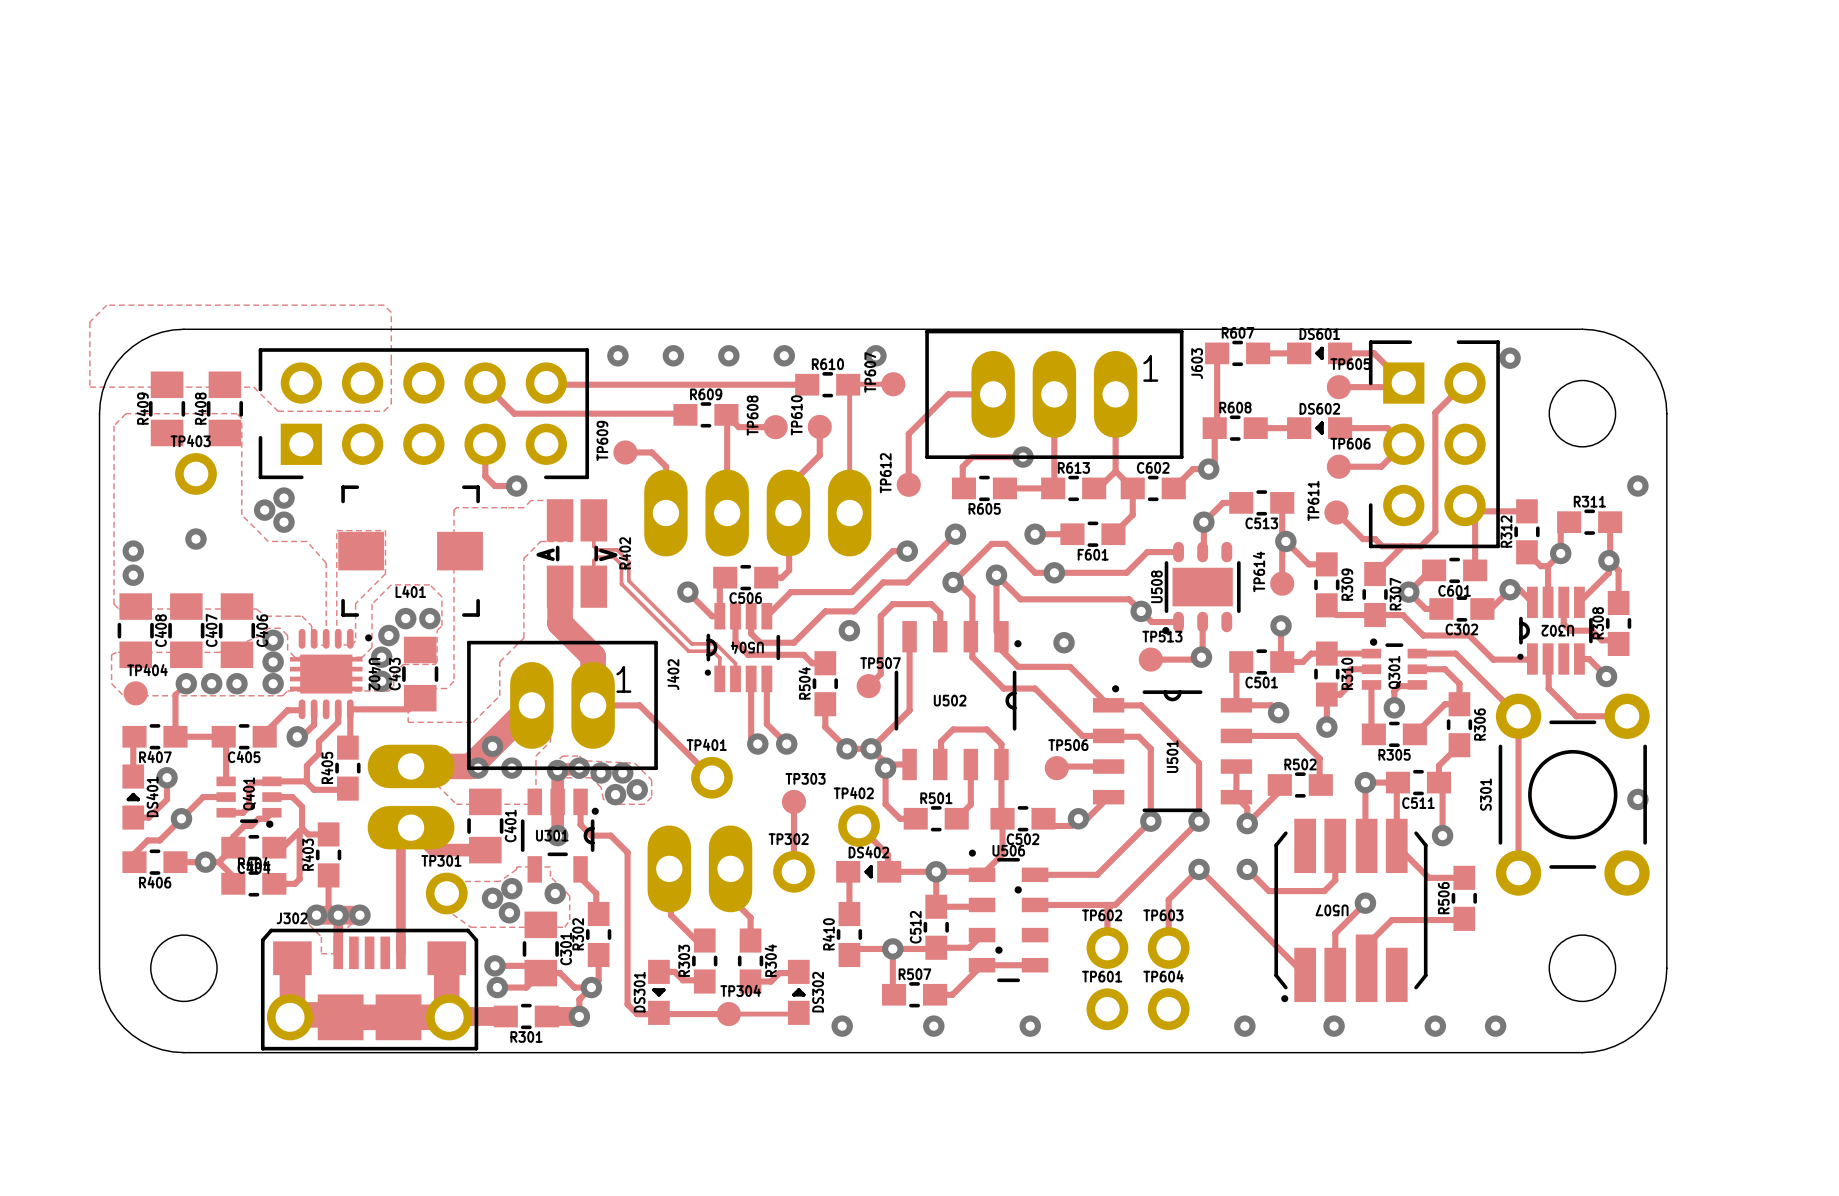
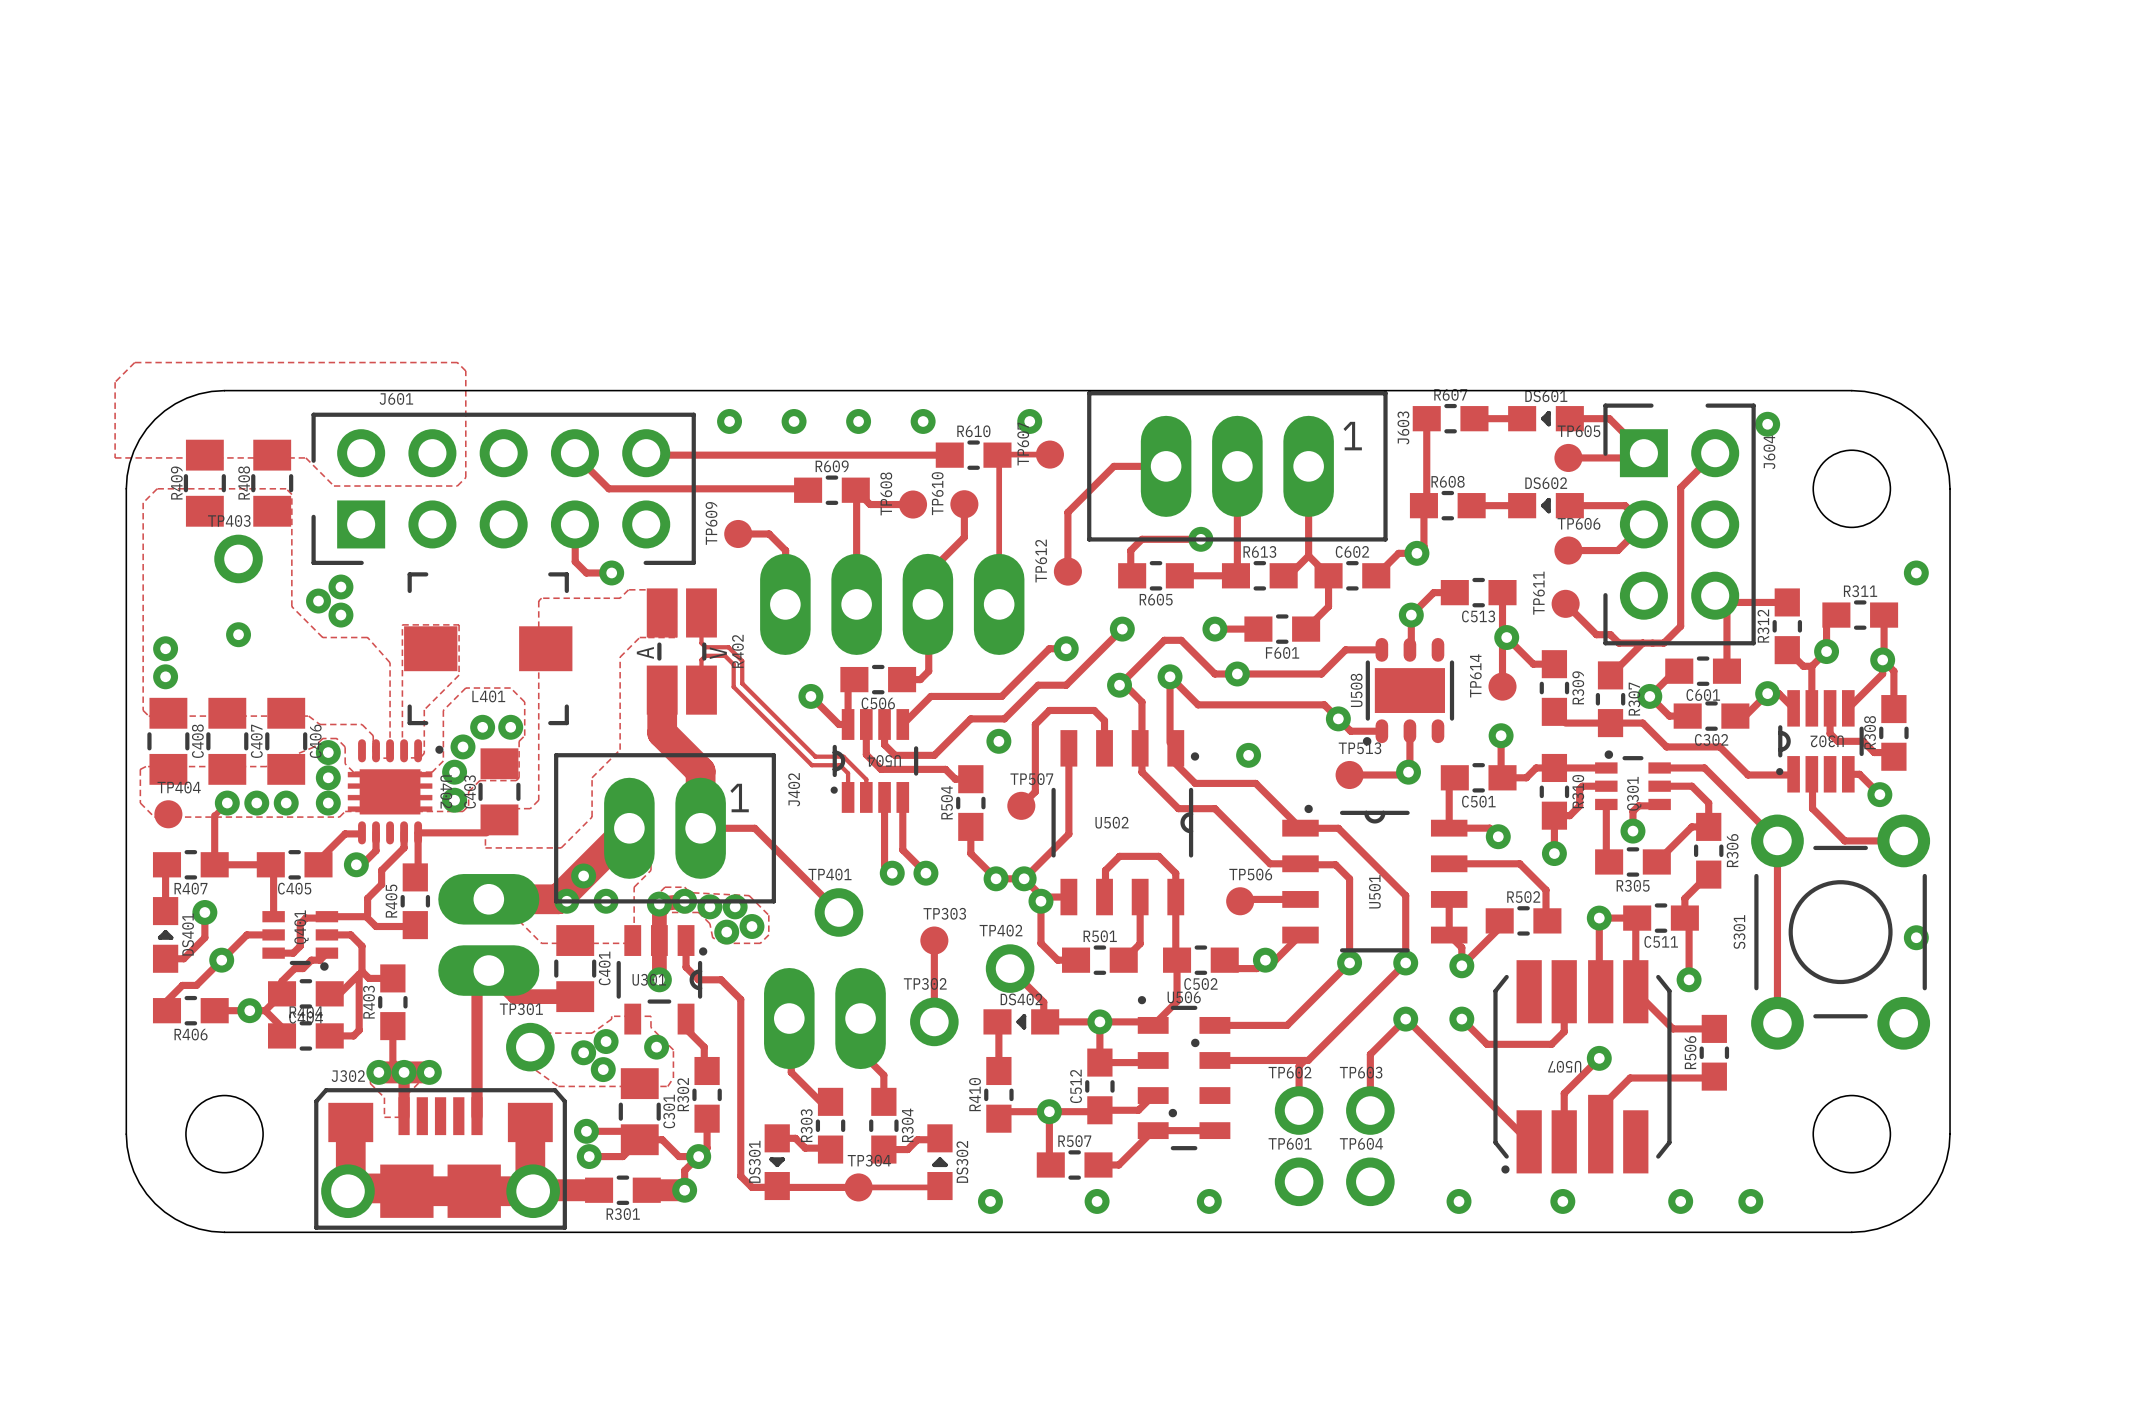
J601 name: none -> J601 (396, 398)
J604 name: none -> J604 (1769, 452)

